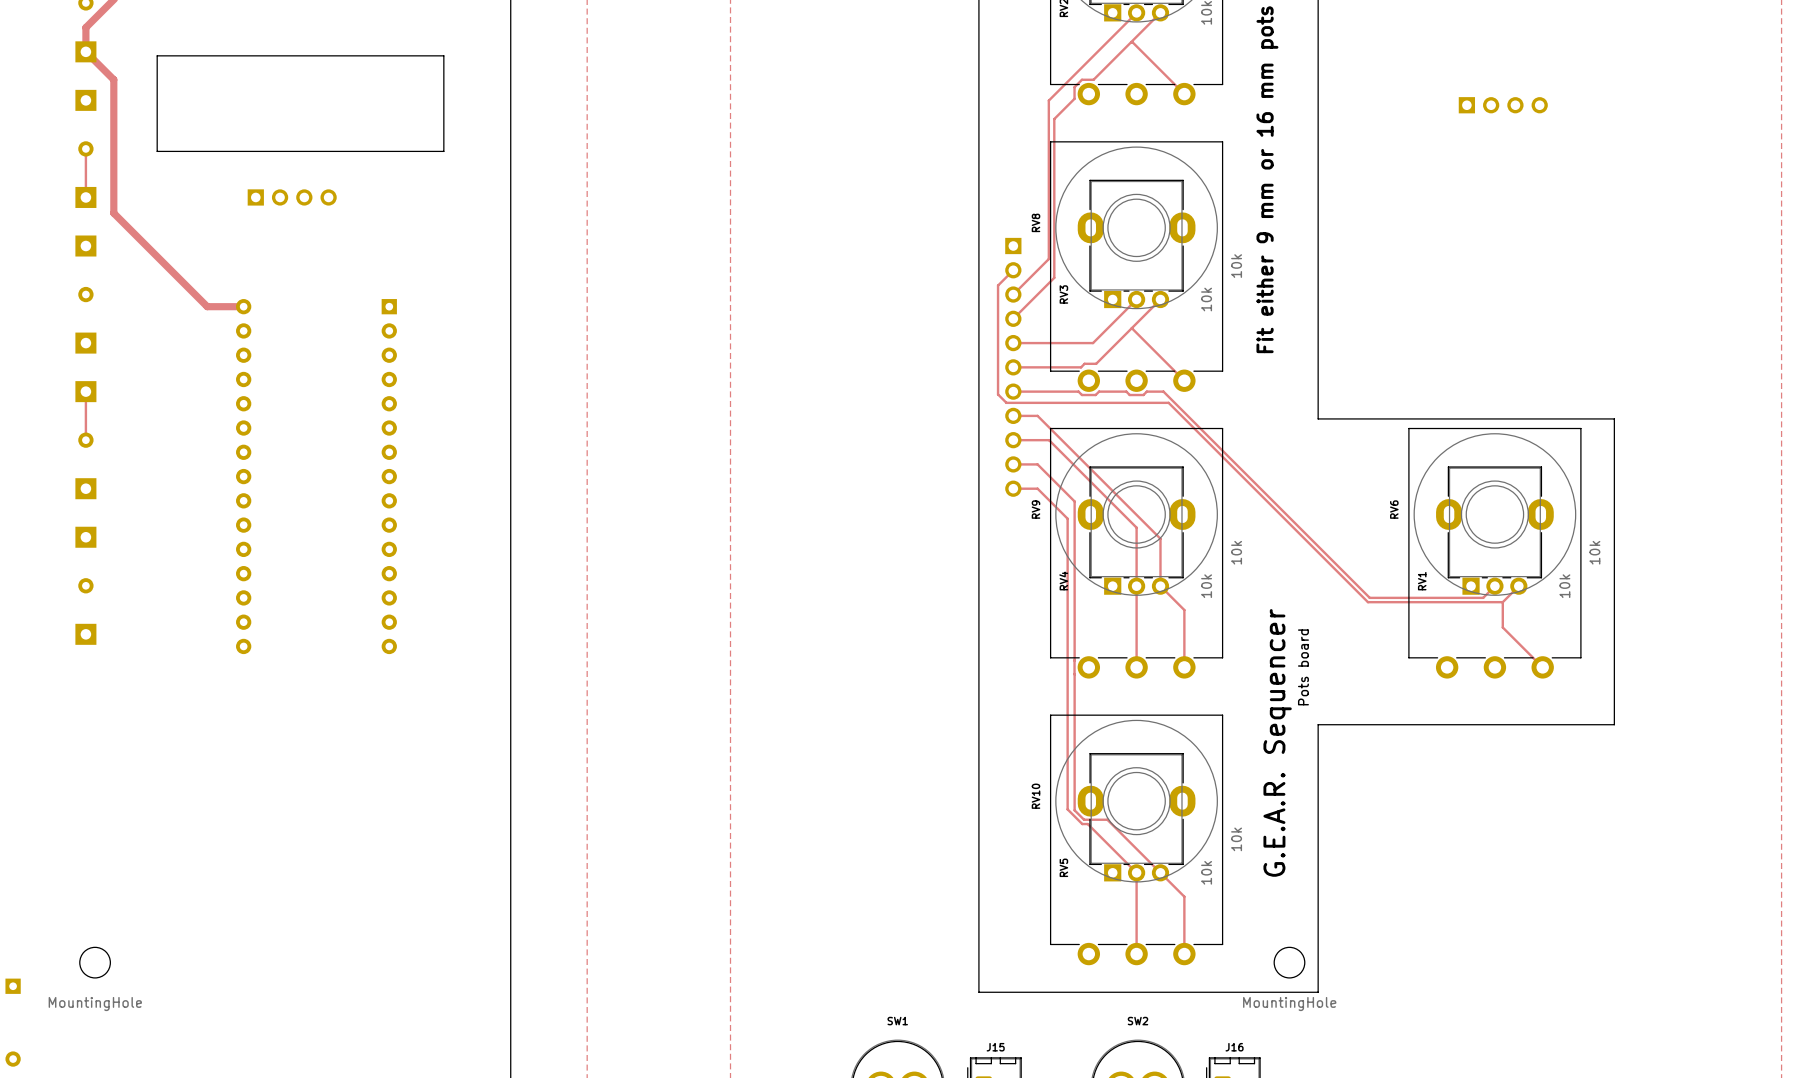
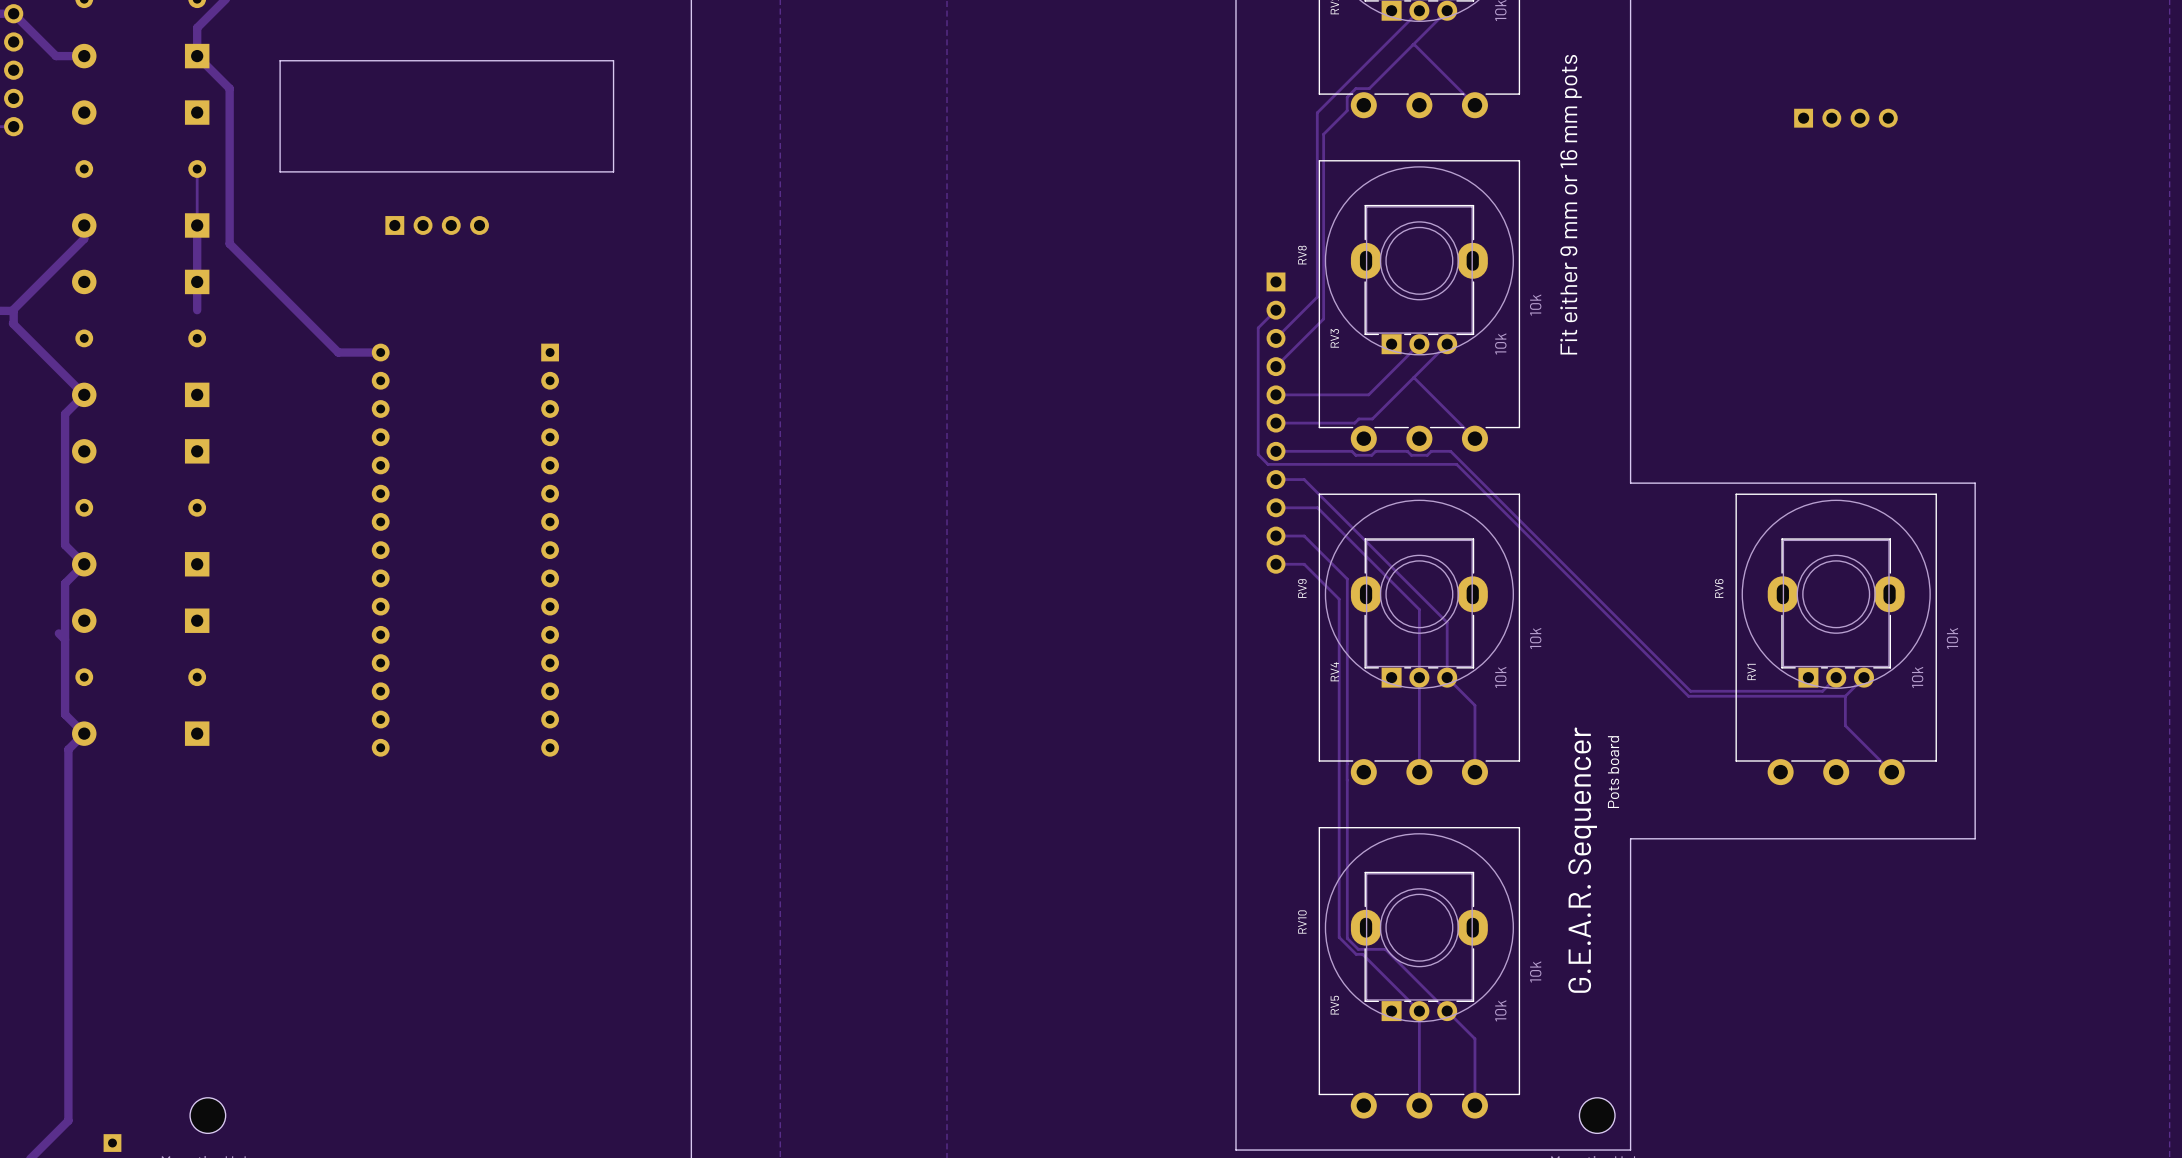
track: none -> (197, 225) (197, 310)
track: (85, 391) (85, 440) -> none

